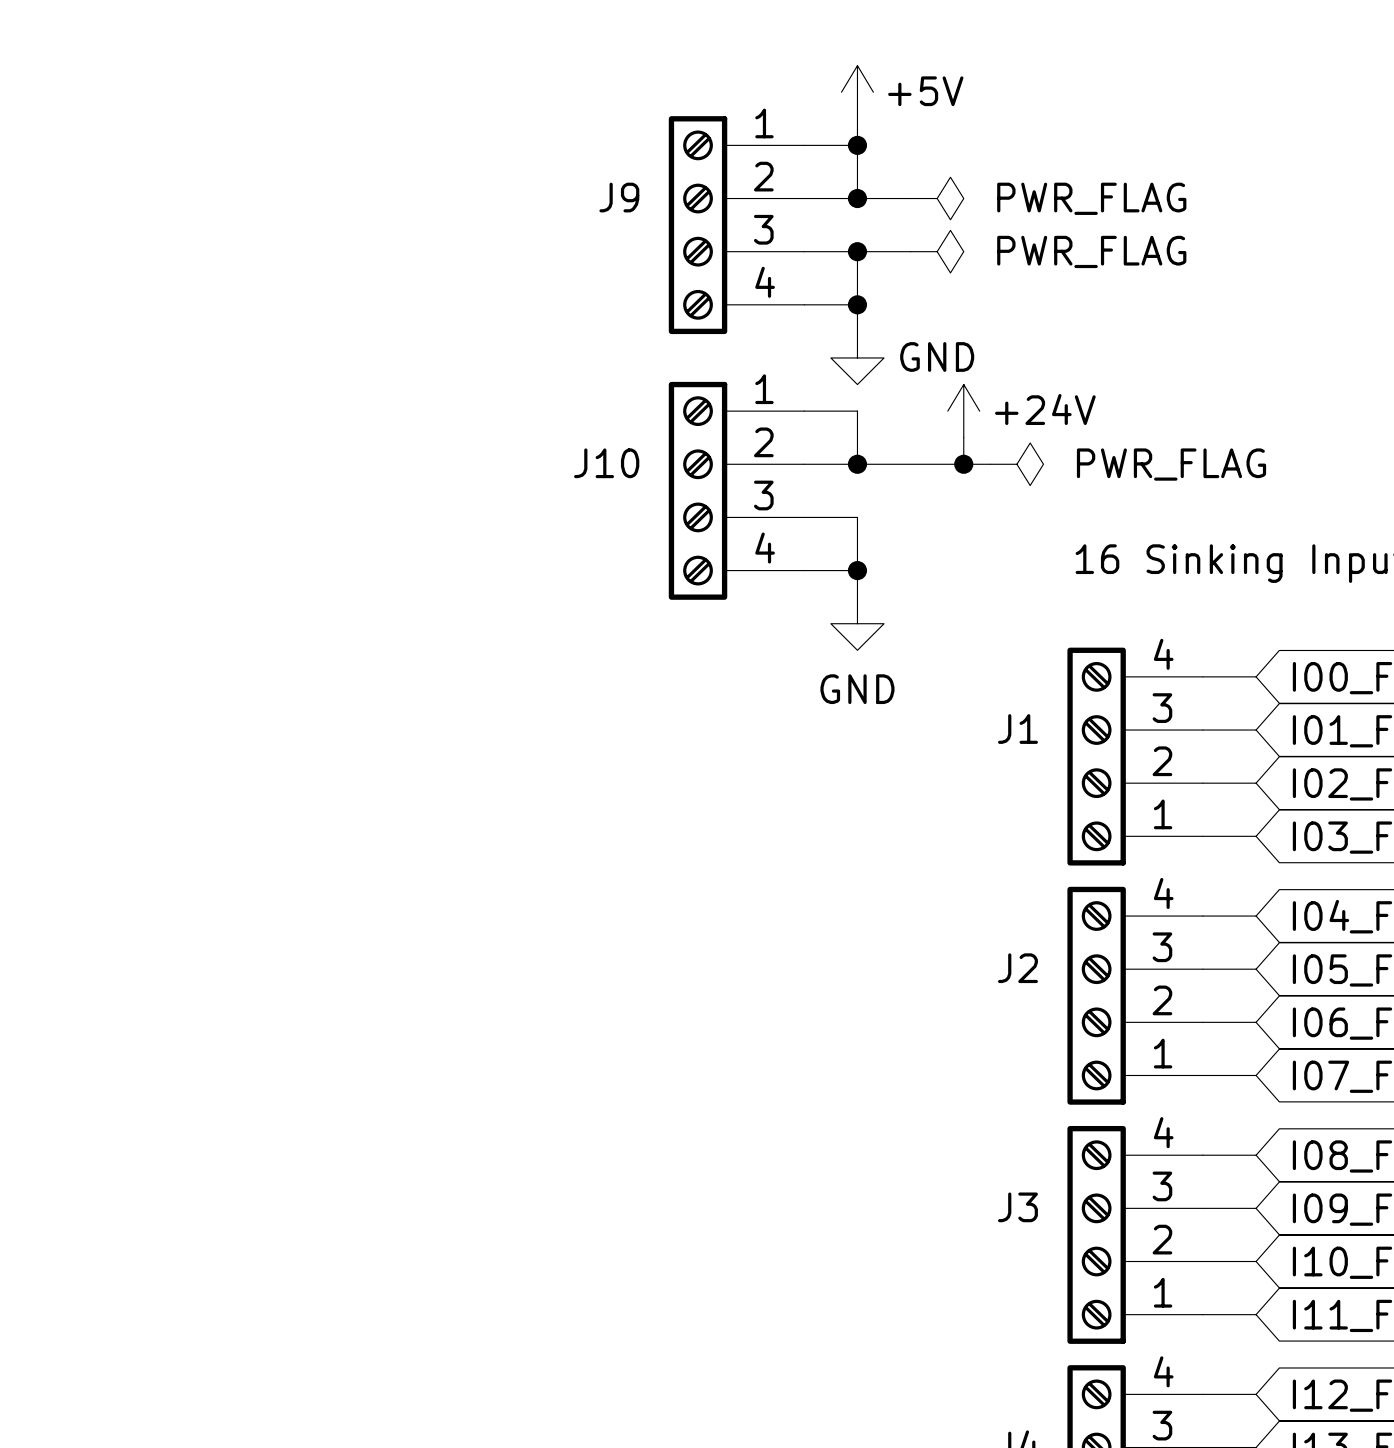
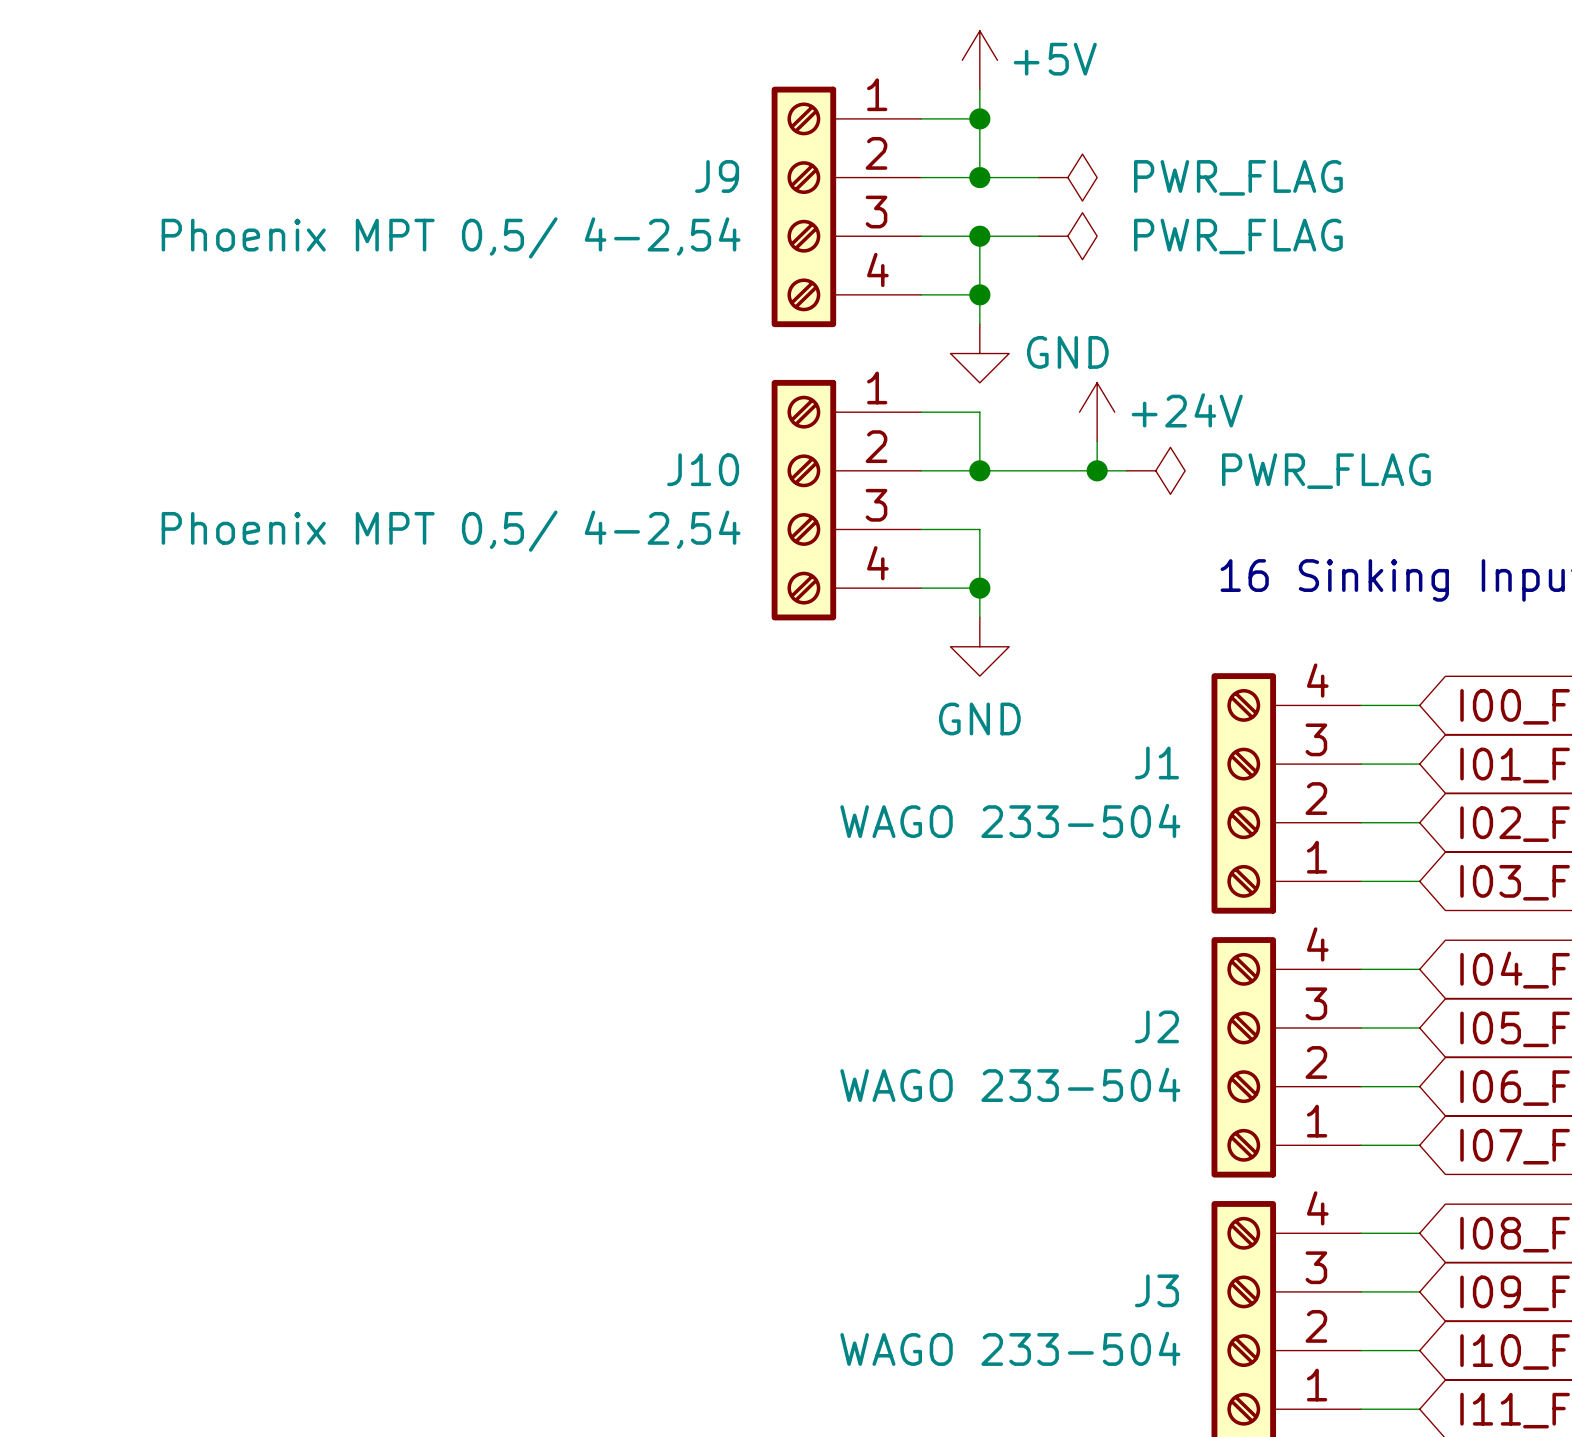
J9 value: none -> Phoenix MPT 0,5/ 4-2,54 (451, 237)
J10 value: none -> Phoenix MPT 0,5/ 4-2,54 (451, 531)
J1 value: none -> WAGO 233-504 (1010, 820)
J2 value: none -> WAGO 233-504 (1010, 1084)
J3 value: none -> WAGO 233-504 (1010, 1348)

